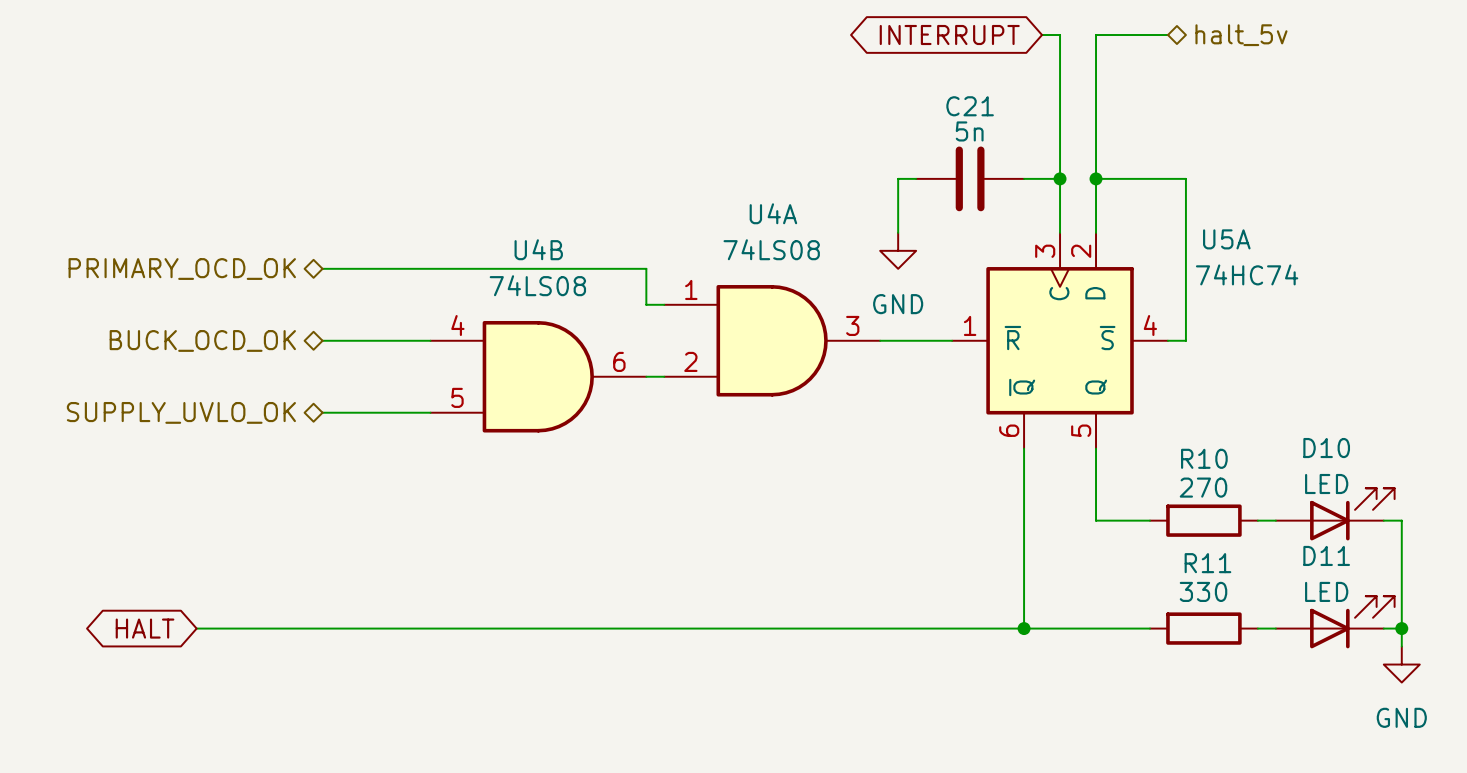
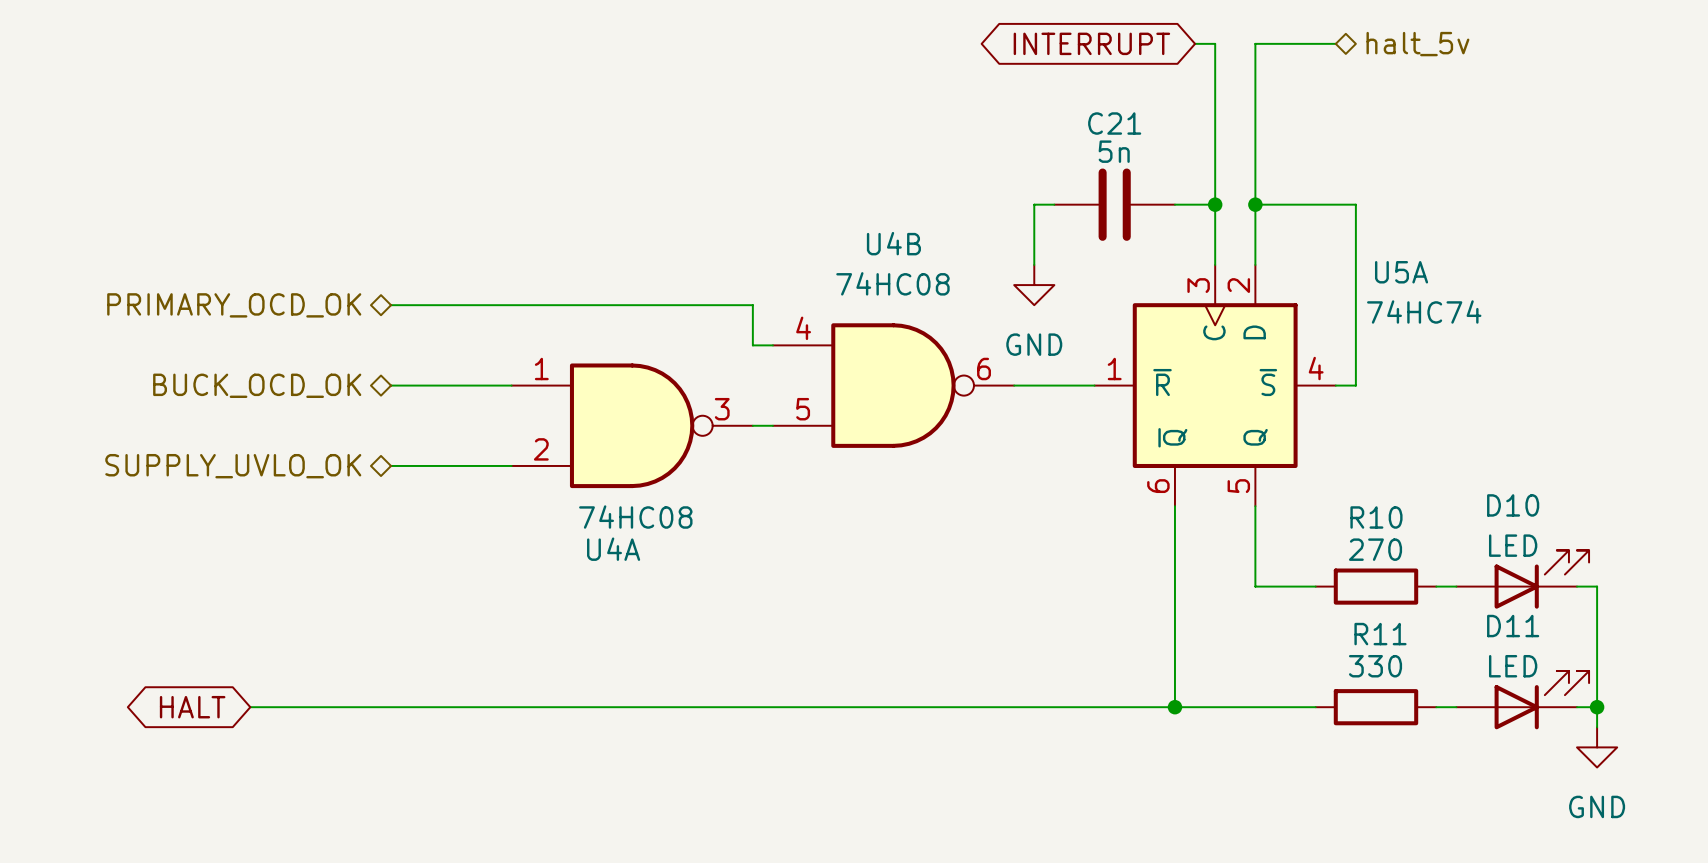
U4A name position: U4A (773, 213) -> U4A (613, 549)
U4A value: 74LS08 (771, 249) -> 74HC08 (635, 517)
U4B value: 74LS08 (537, 285) -> 74HC08 (892, 283)
U4A symbol: [664, 285, 881, 397] -> [511, 363, 753, 489]
U4B symbol: [430, 320, 647, 433] -> [772, 323, 1015, 448]

